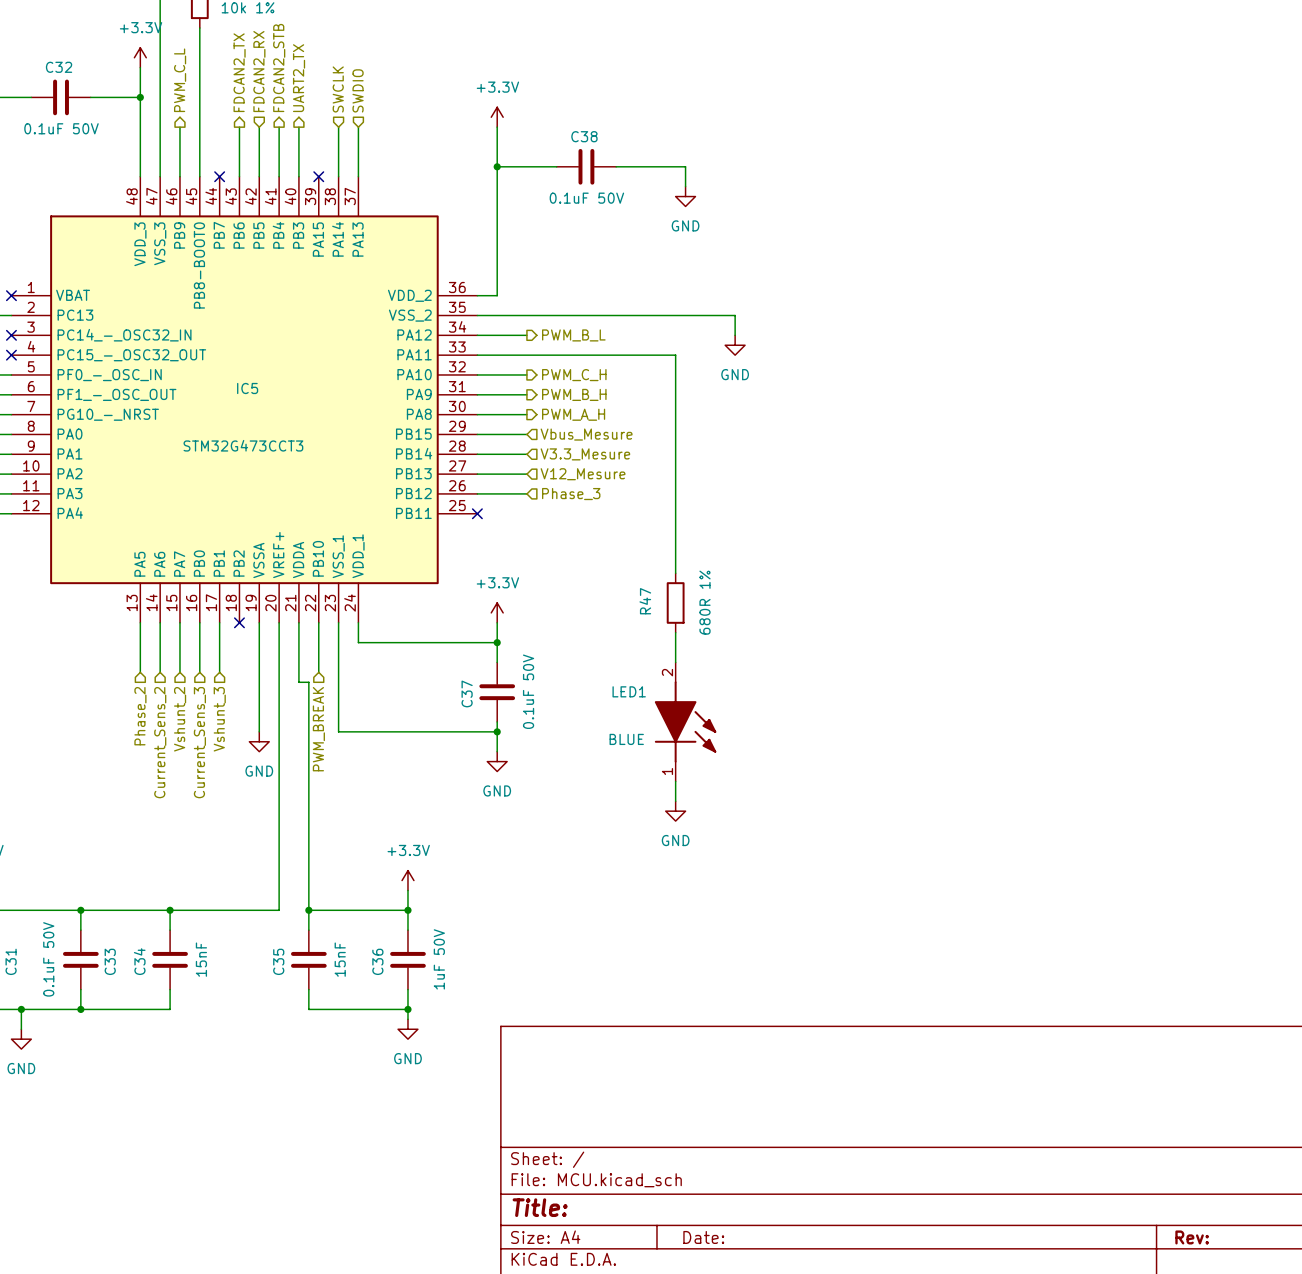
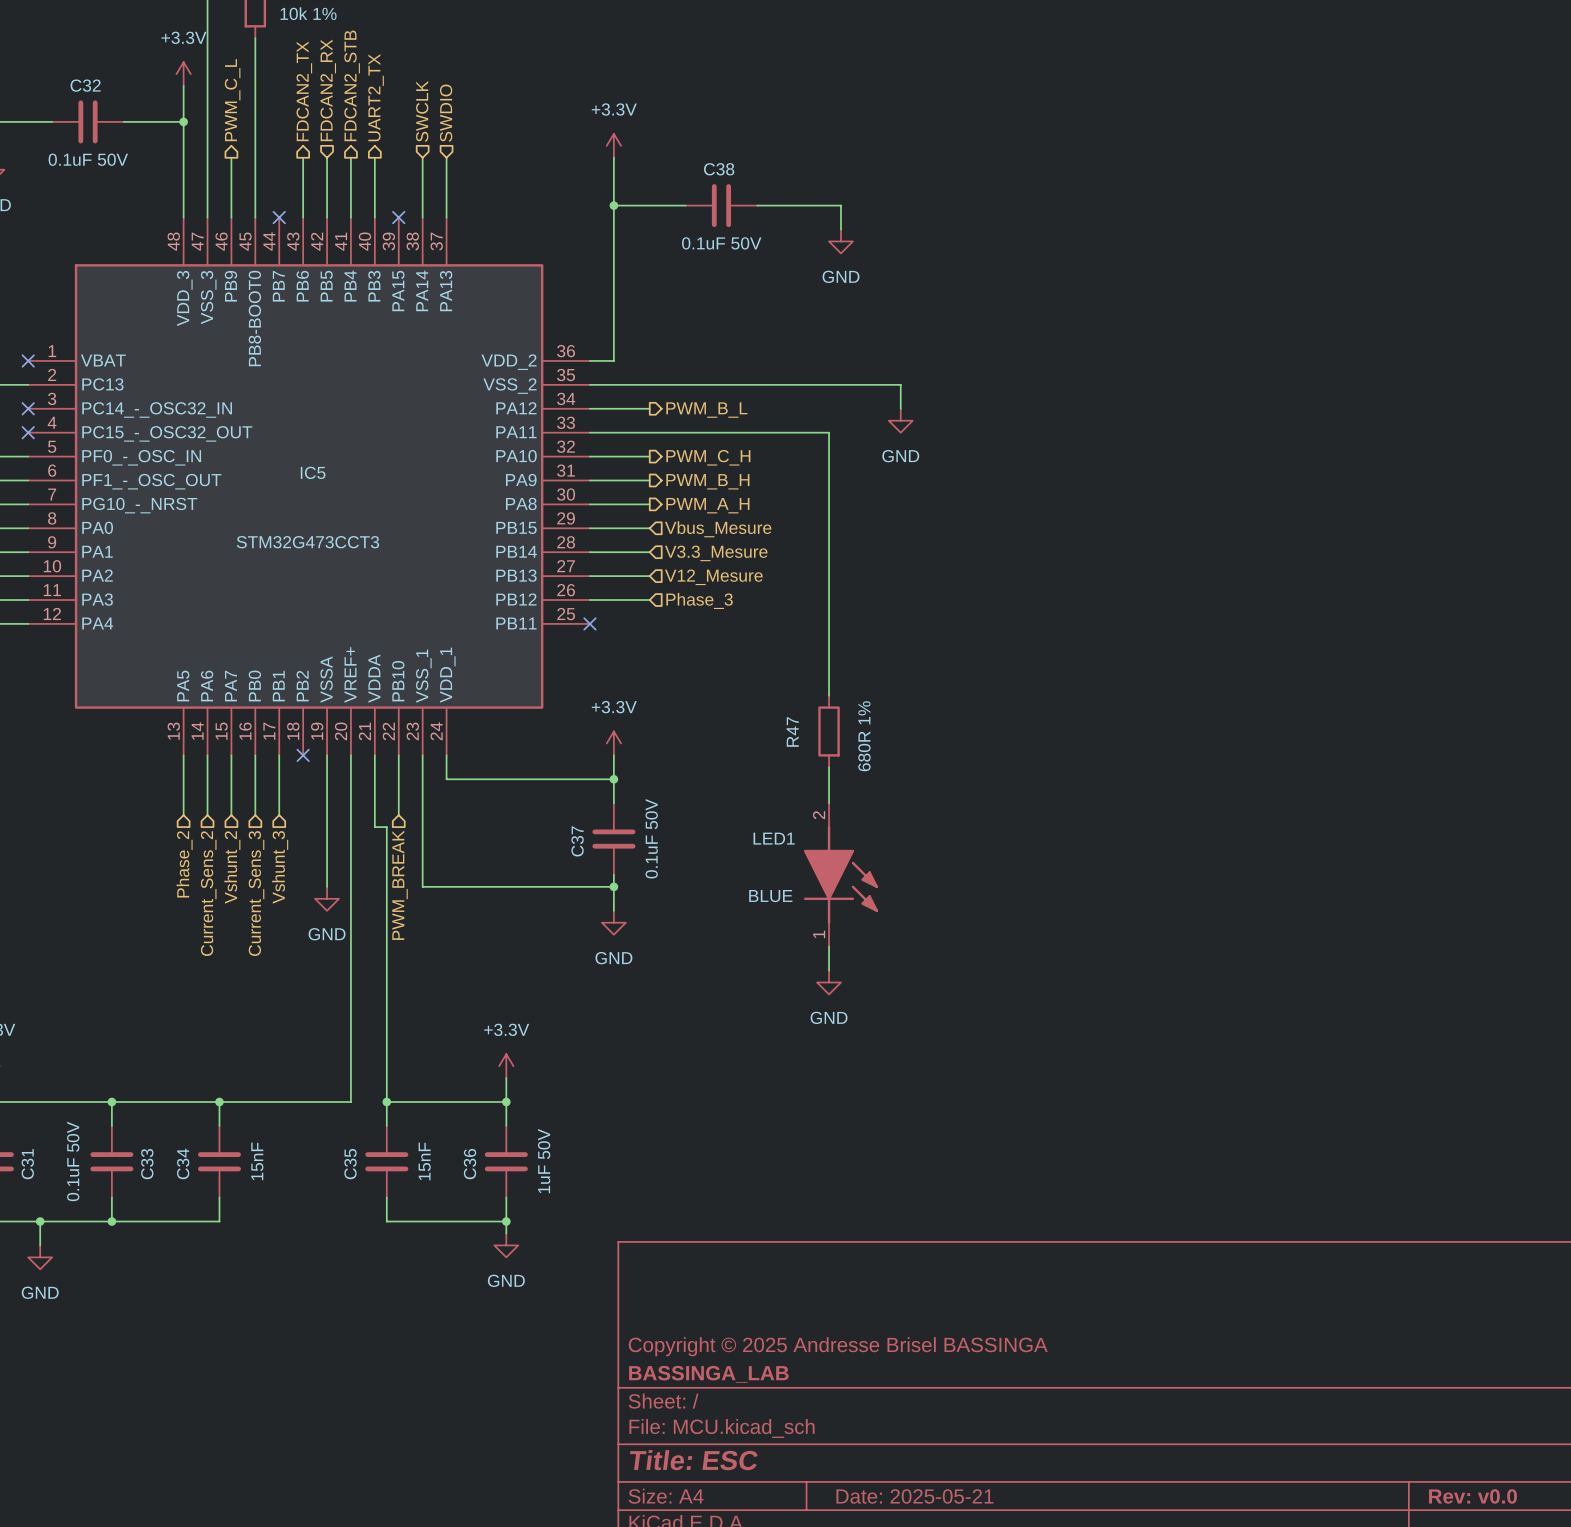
title block: none -> Copyright © 2025 Andresse Brisel BASSINGA (838, 1346)
title block: none -> BASSINGA_LAB (708, 1374)
title block: Title: (540, 1207) -> Title: ESC (693, 1460)
title block: Date: (703, 1237) -> Date: 2025-05-21 (914, 1496)
title block: Rev: (1192, 1237) -> Rev: v0.0 (1473, 1496)

